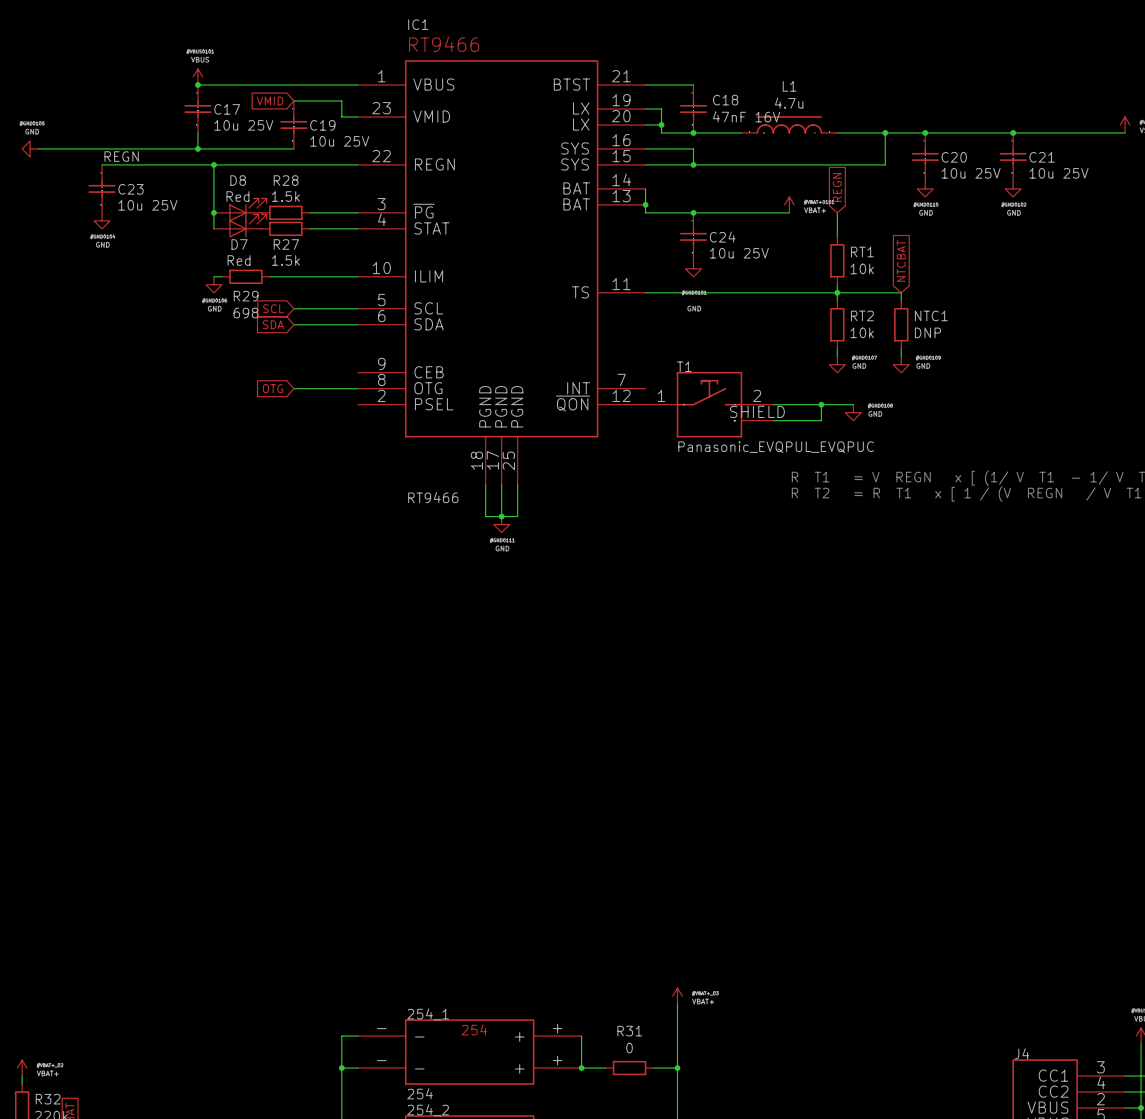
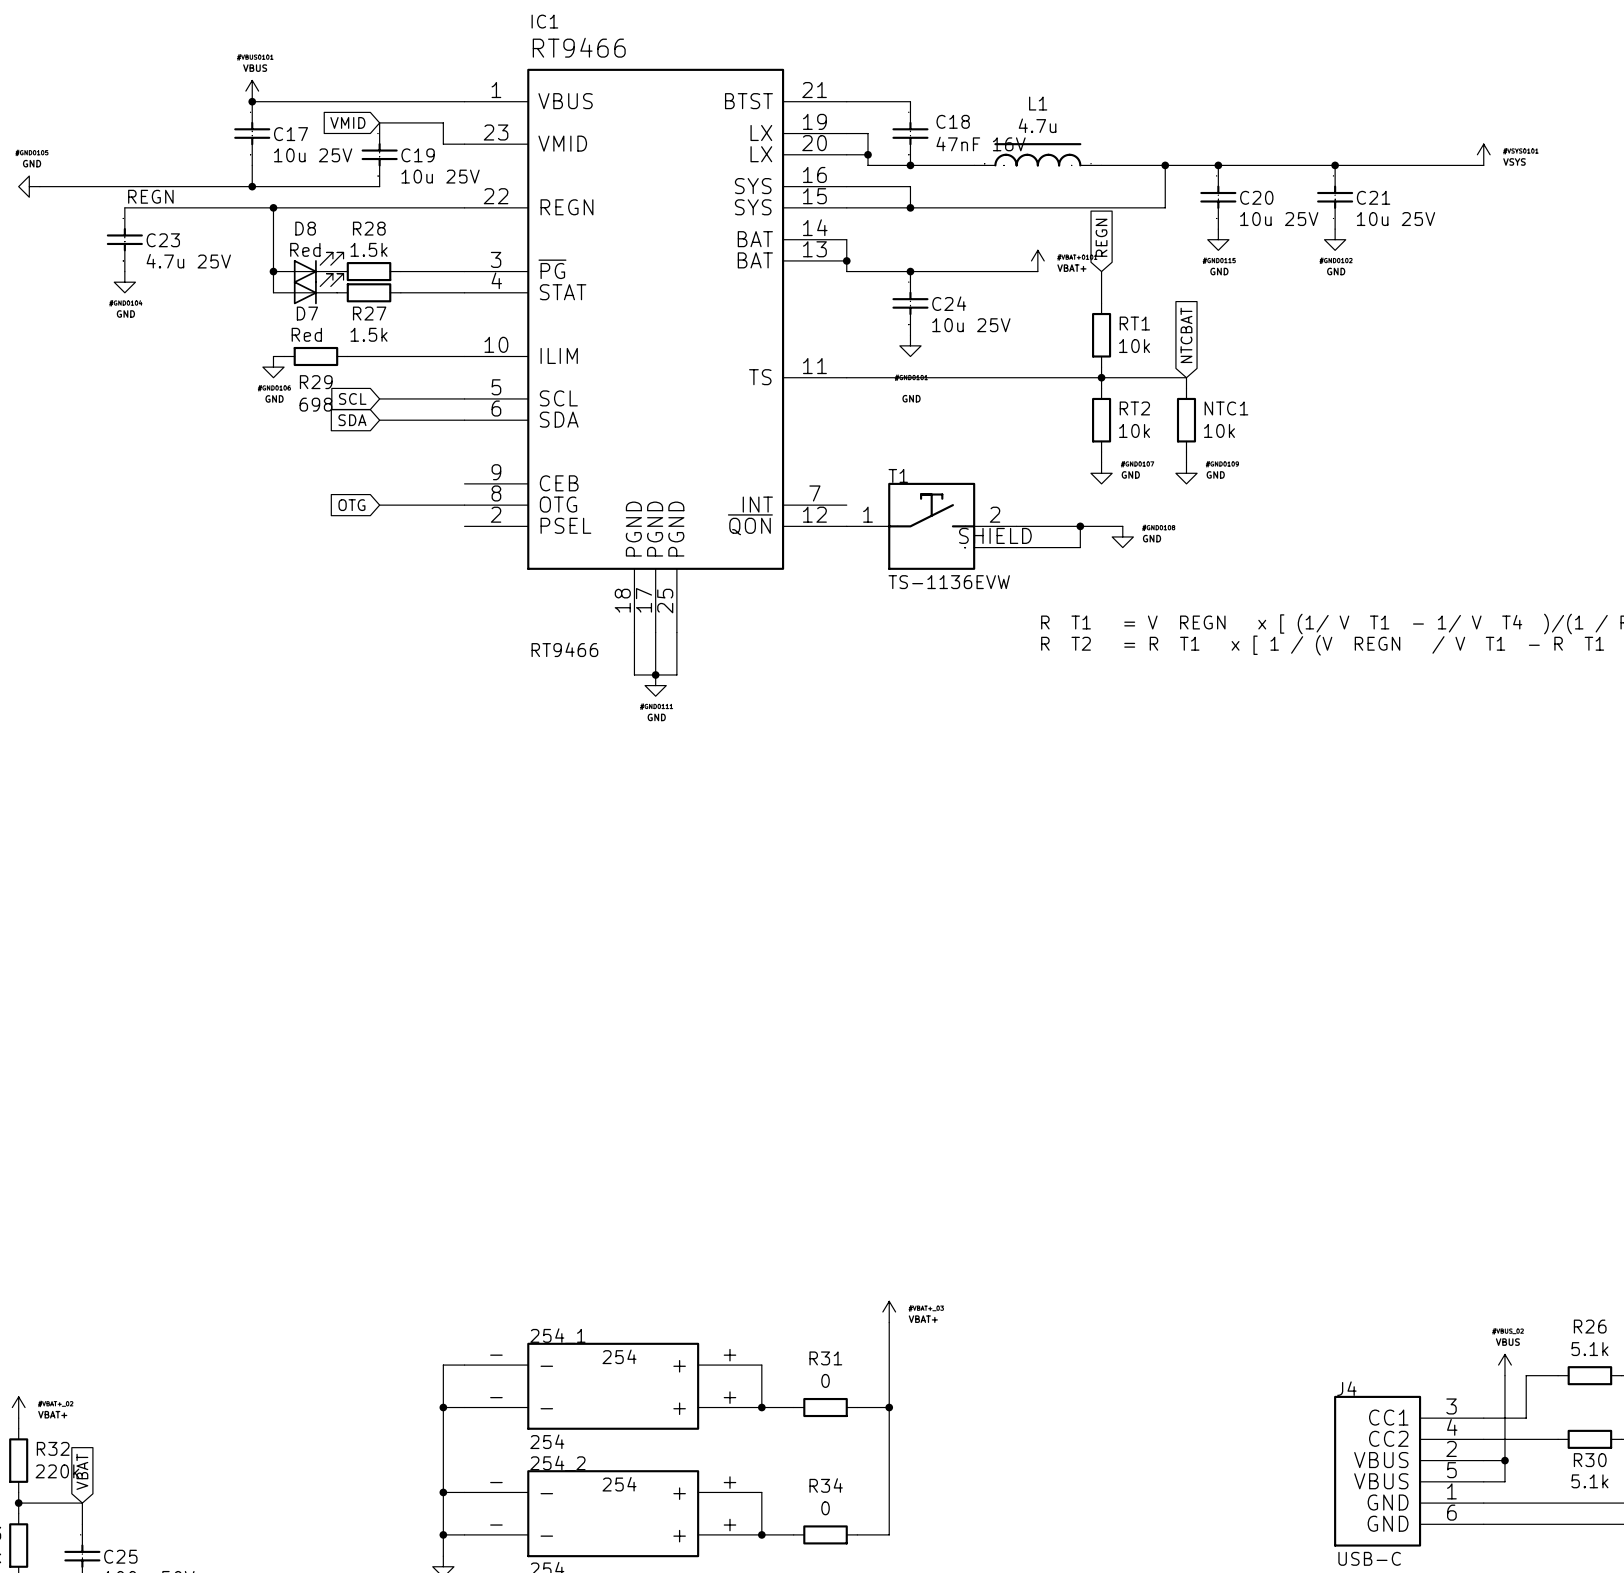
C23 value: 10u 25V (147, 205) -> 4.7u 25V (188, 261)
NTC1 value: DNP (927, 332) -> 10k (1219, 430)
T1 value: Panasonic_EVQPUL_EVQPUC (776, 447) -> TS-1136EVW (949, 582)

